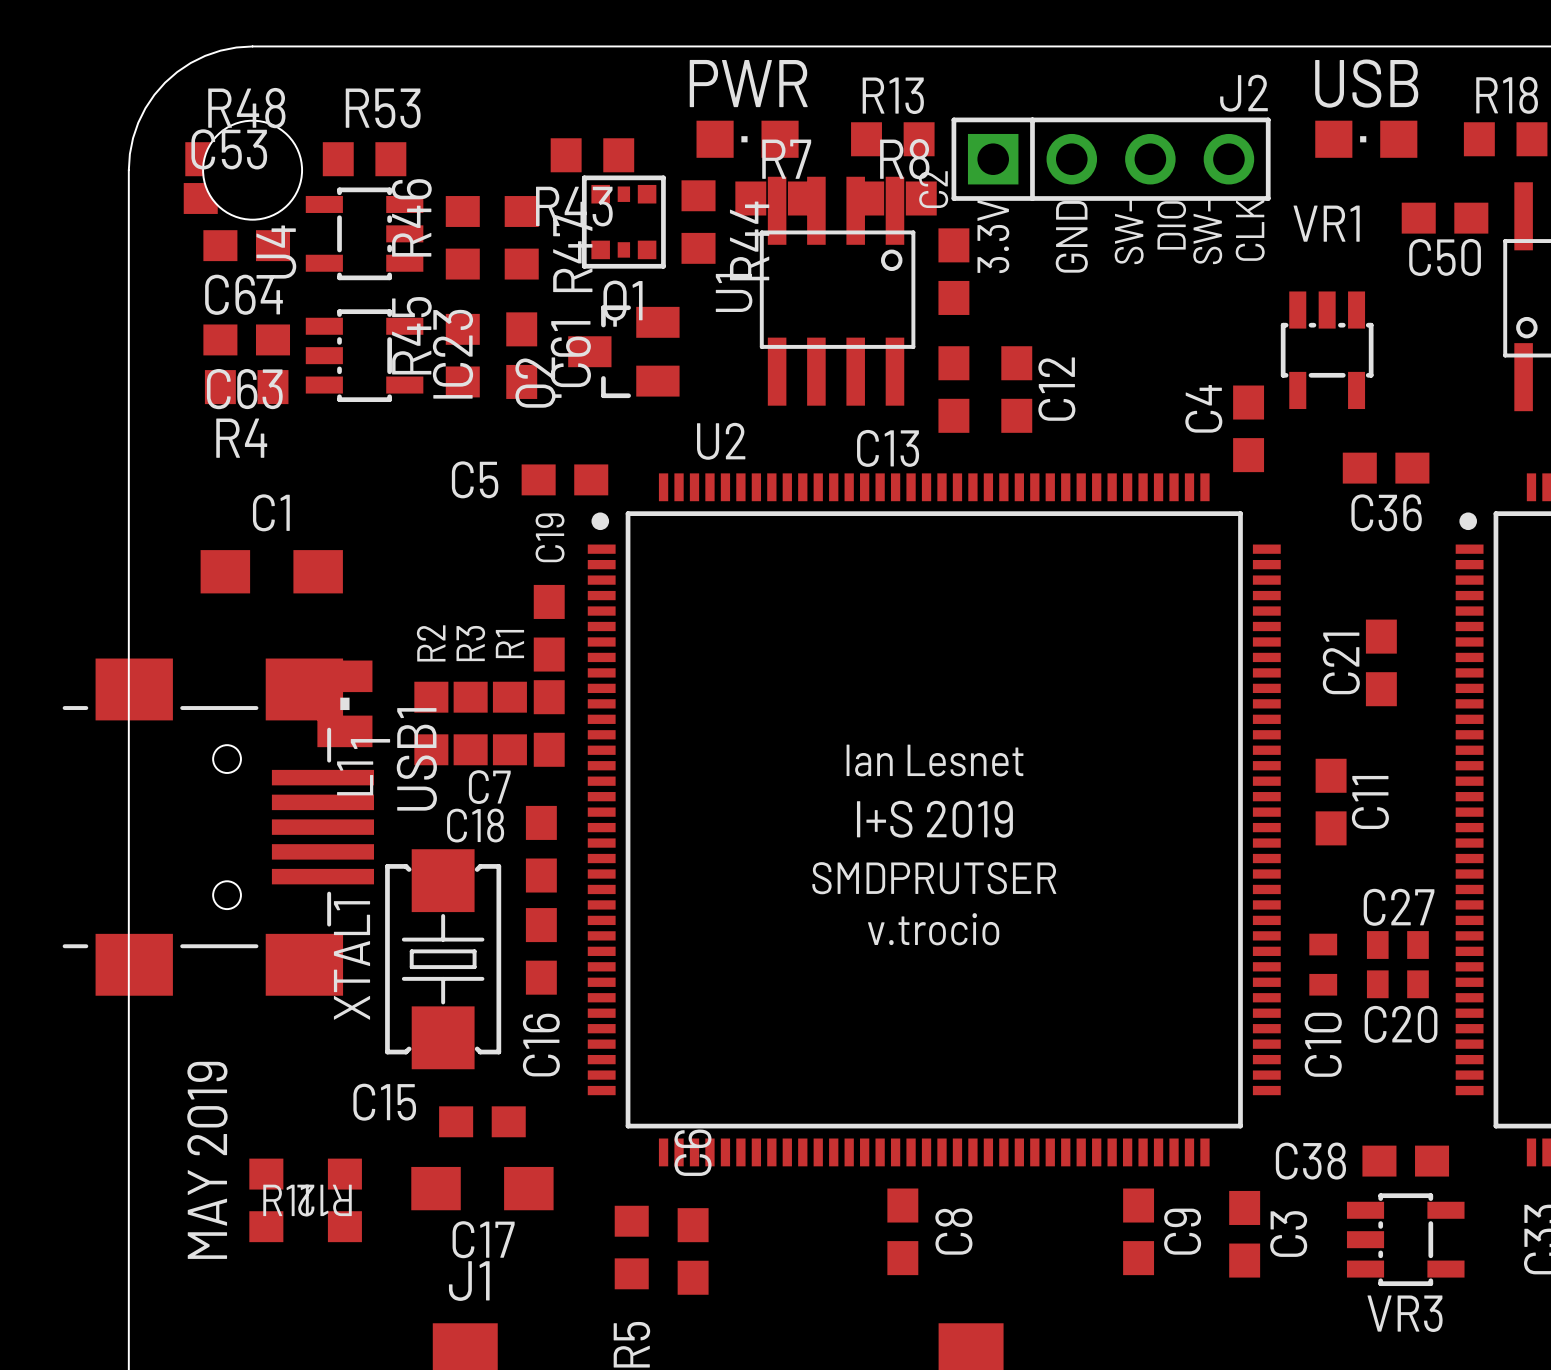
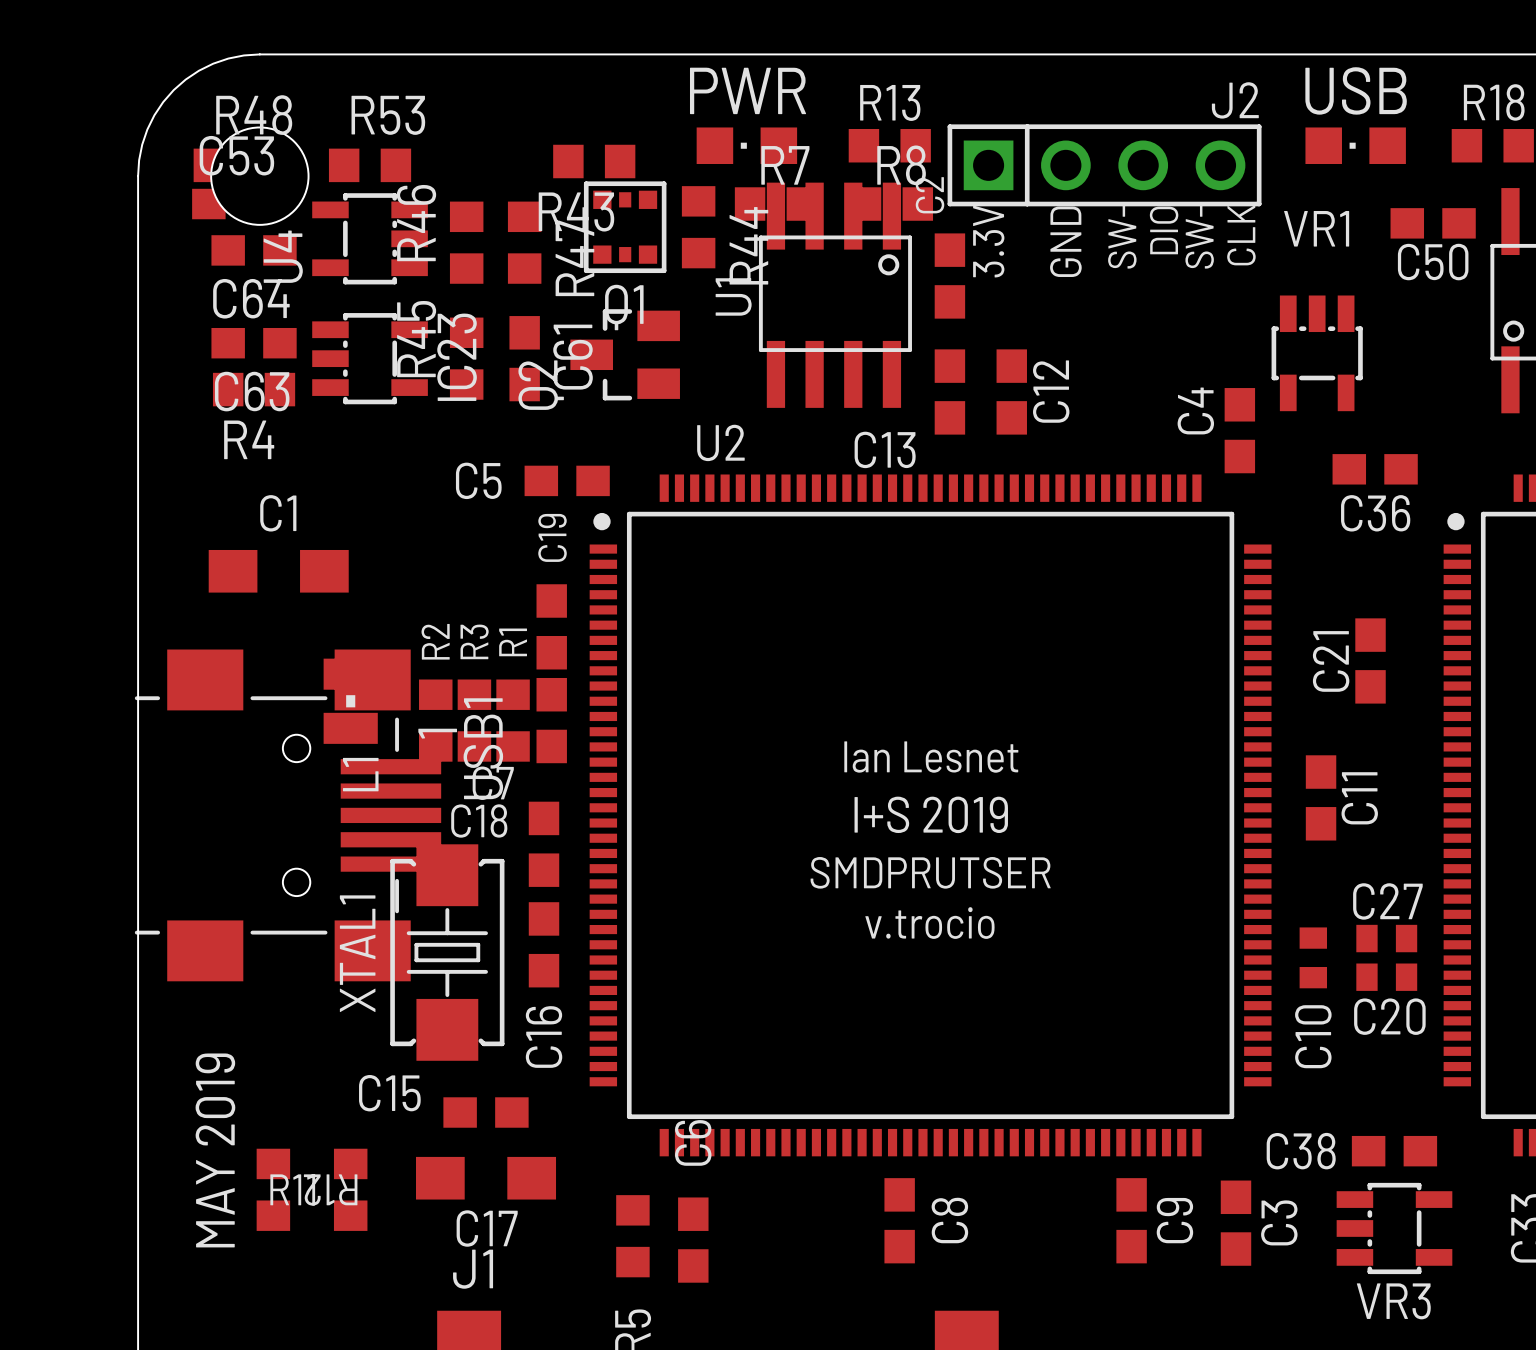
USB1 position: (218, 827) -> (288, 815)

